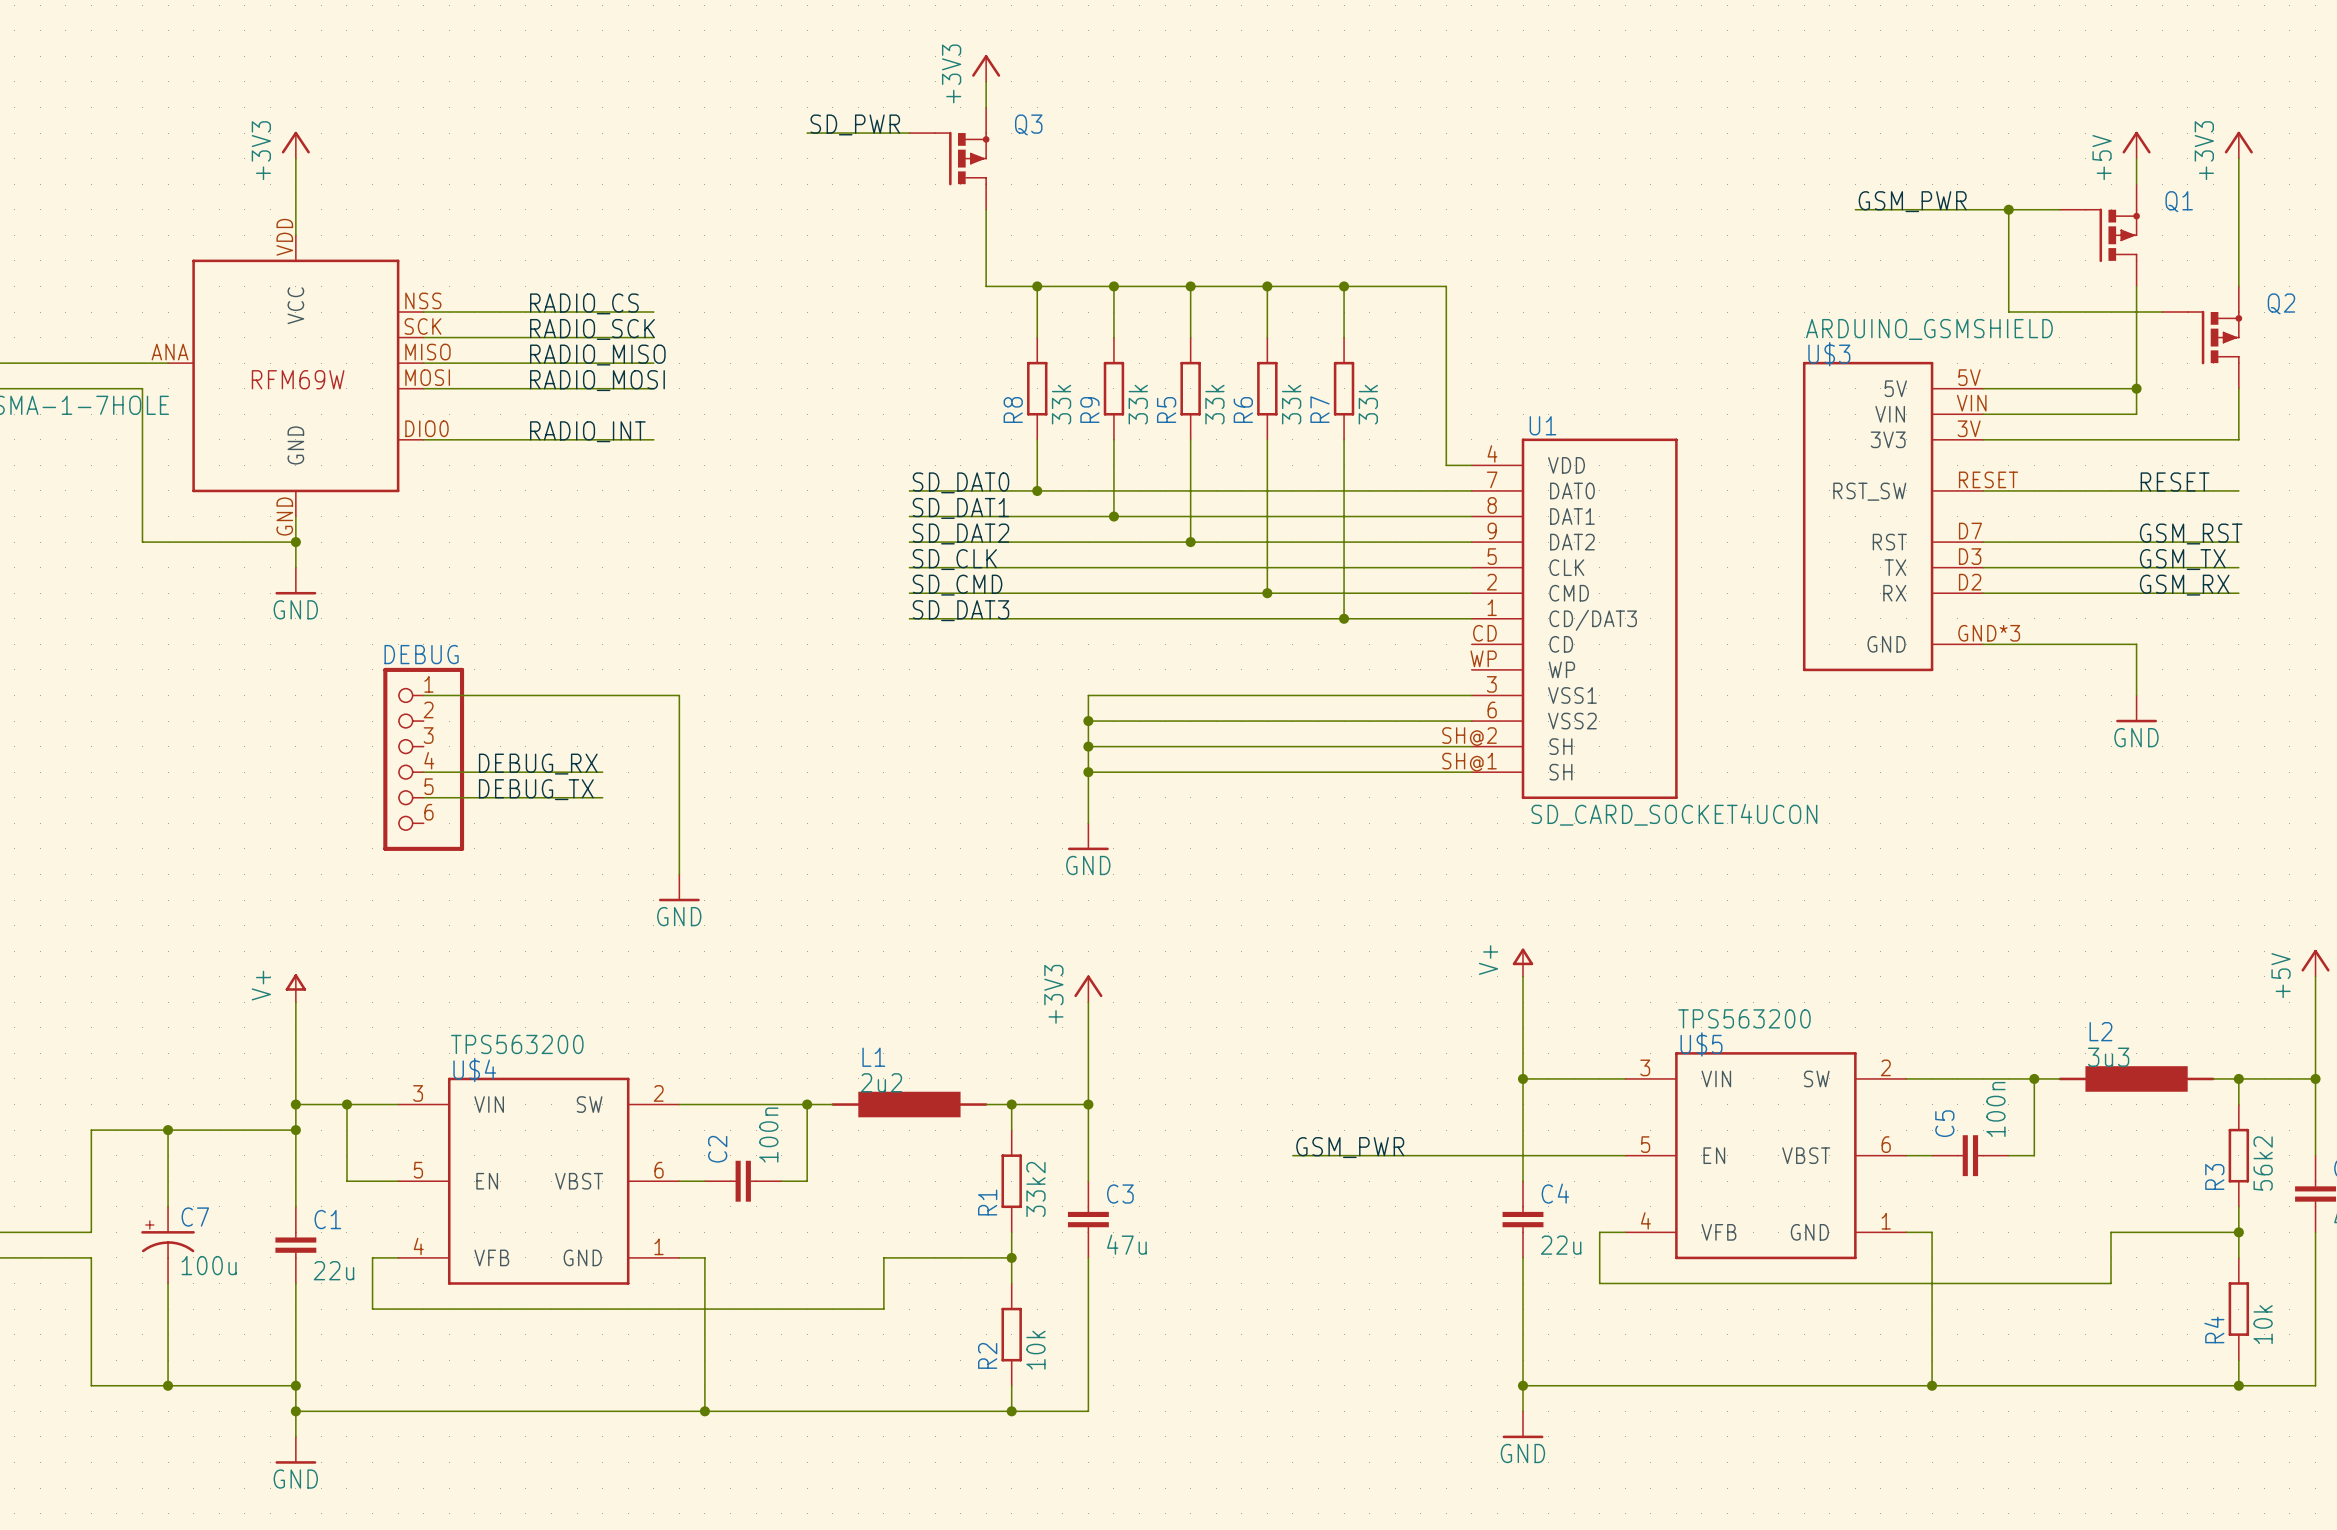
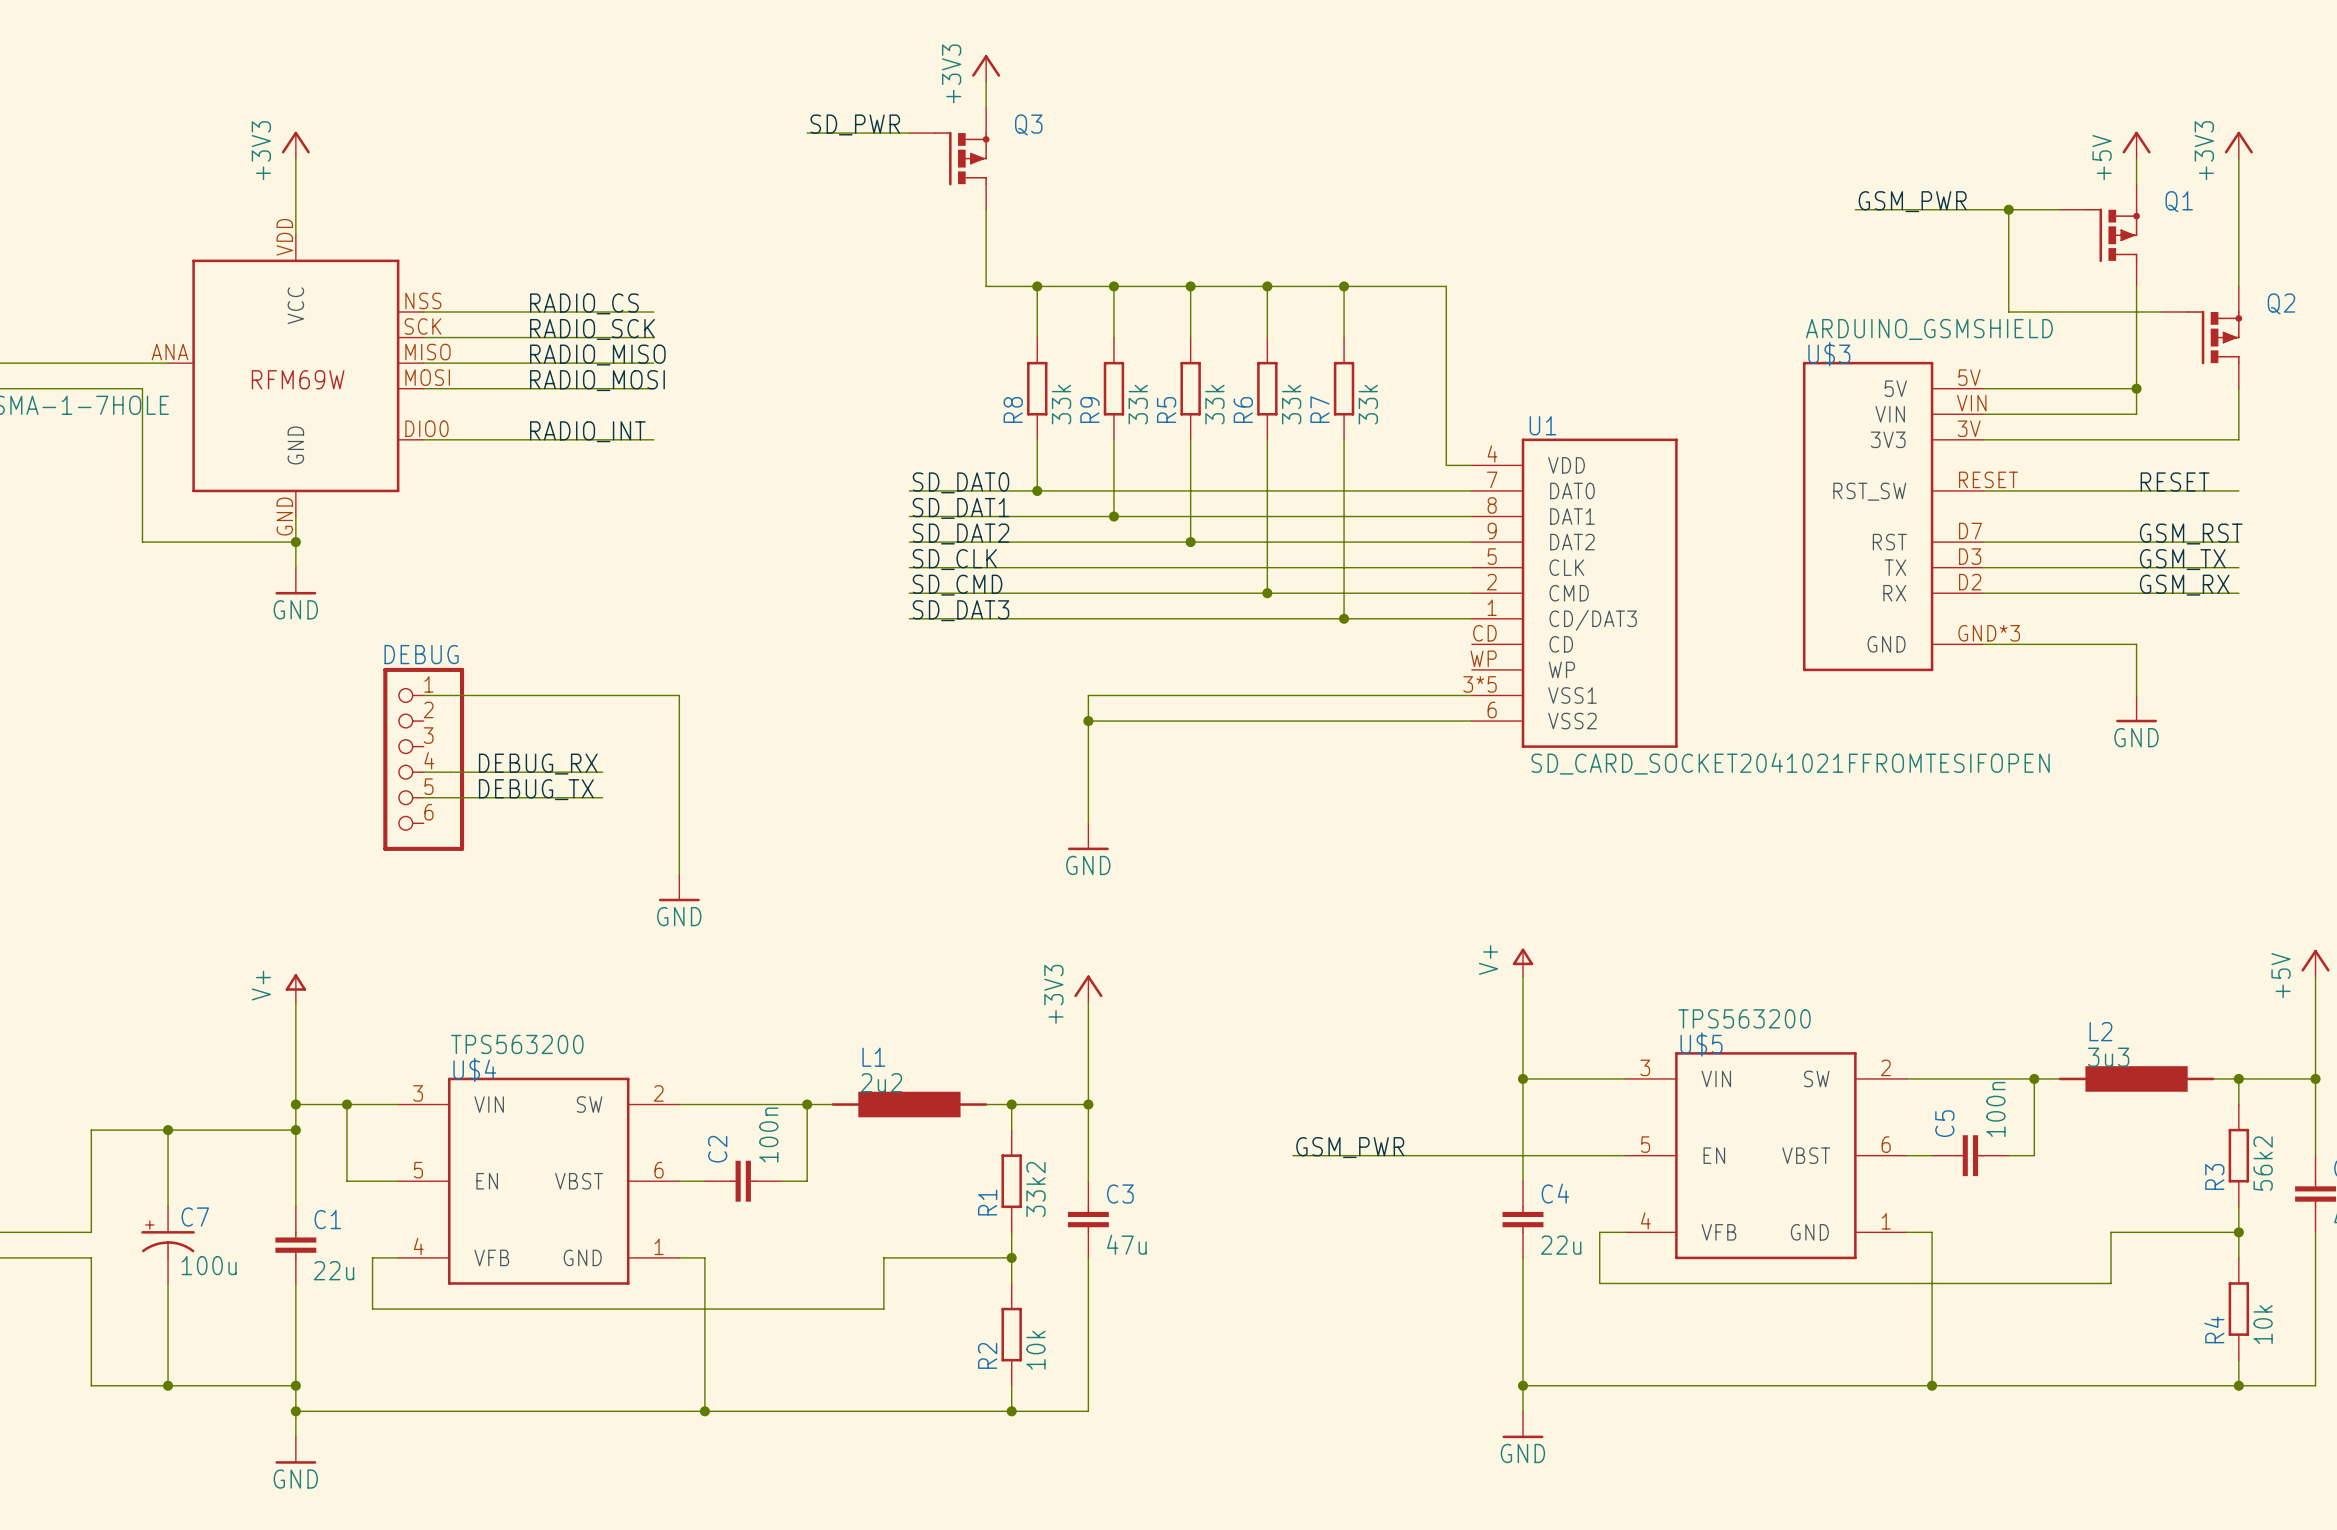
U1 symbol: [1471, 438, 1678, 800] -> [1471, 438, 1678, 748]
wire: (1088, 746) (1471, 746) -> none
junction: (1088, 746) -> none
wire: (1088, 772) (1471, 772) -> none
junction: (1088, 772) -> none
U1 value: SD_CARD_SOCKET4UCON (1674, 814) -> SD_CARD_SOCKET2041021FFROMTESIFOPEN (1790, 763)

